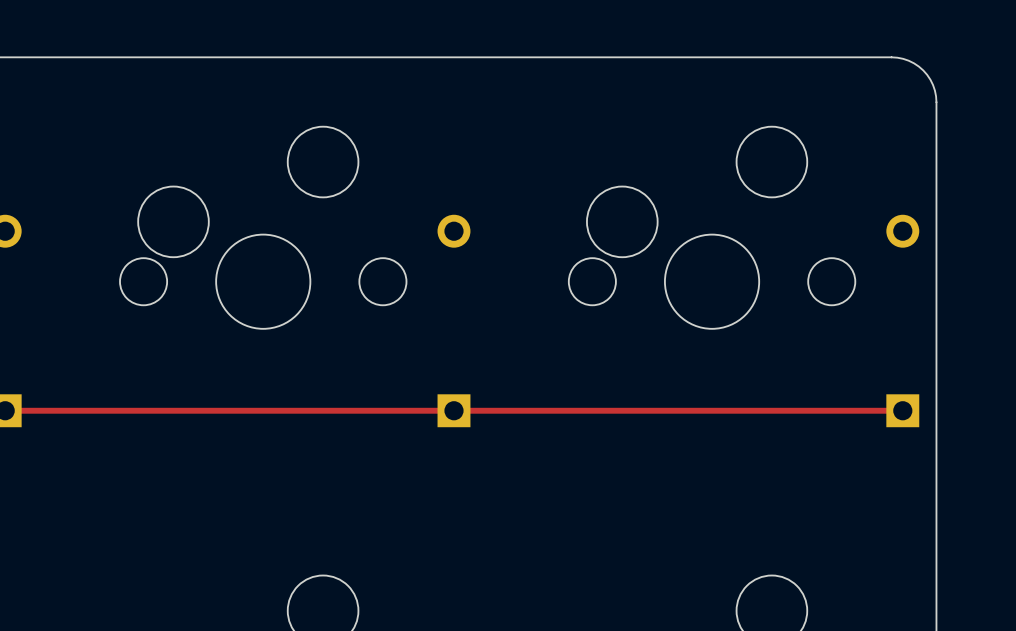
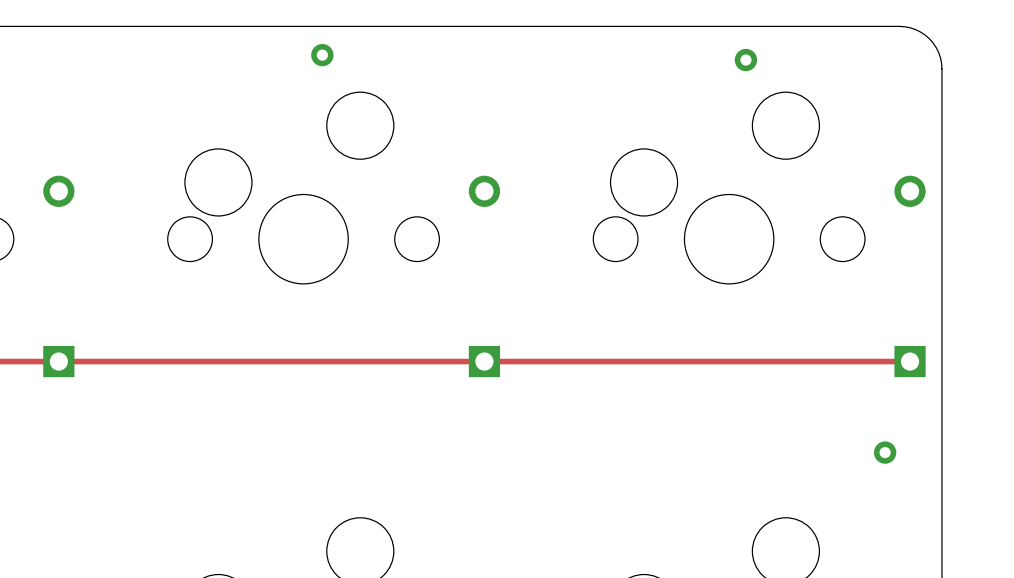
via: none -> (322, 55)
via: none -> (745, 60)
via: none -> (885, 452)

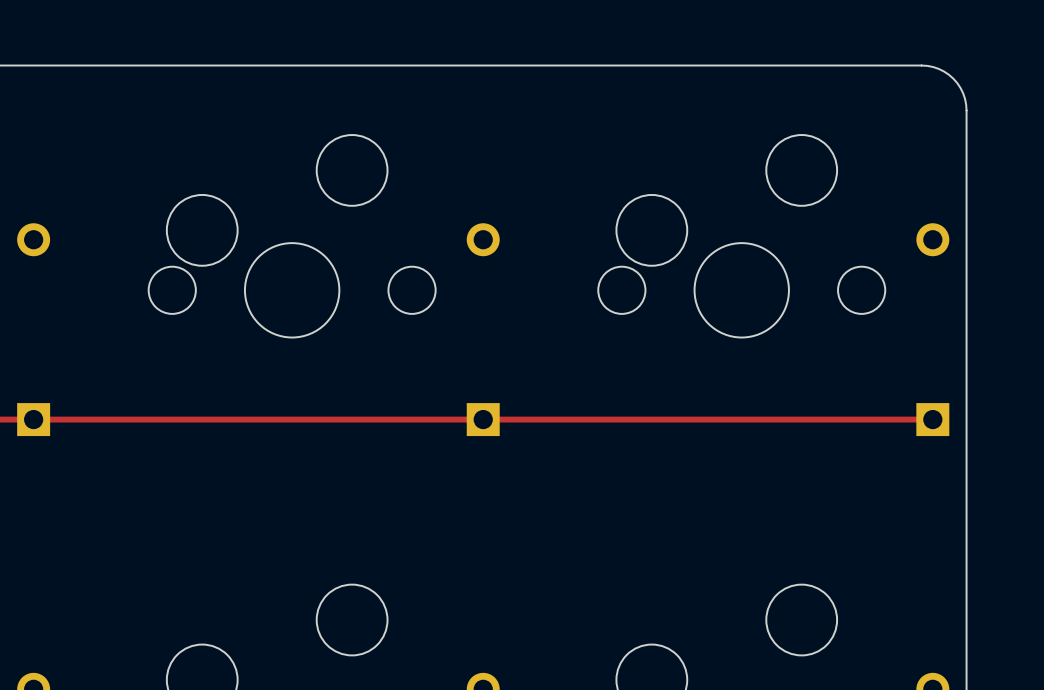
via: (322, 55) -> none
via: (745, 60) -> none
via: (885, 452) -> none

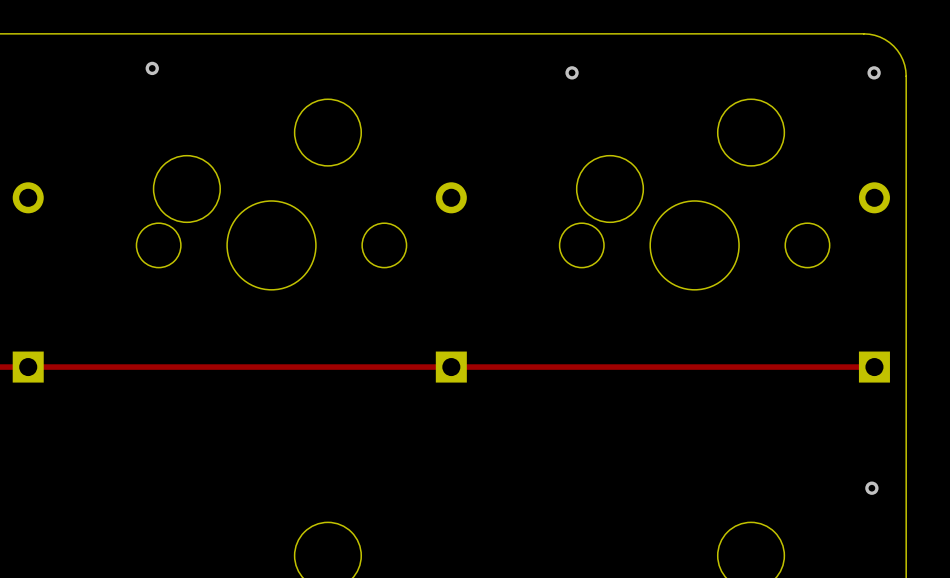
via: none -> (152, 68)
via: none -> (572, 72)
via: none -> (874, 72)
via: none -> (871, 488)

